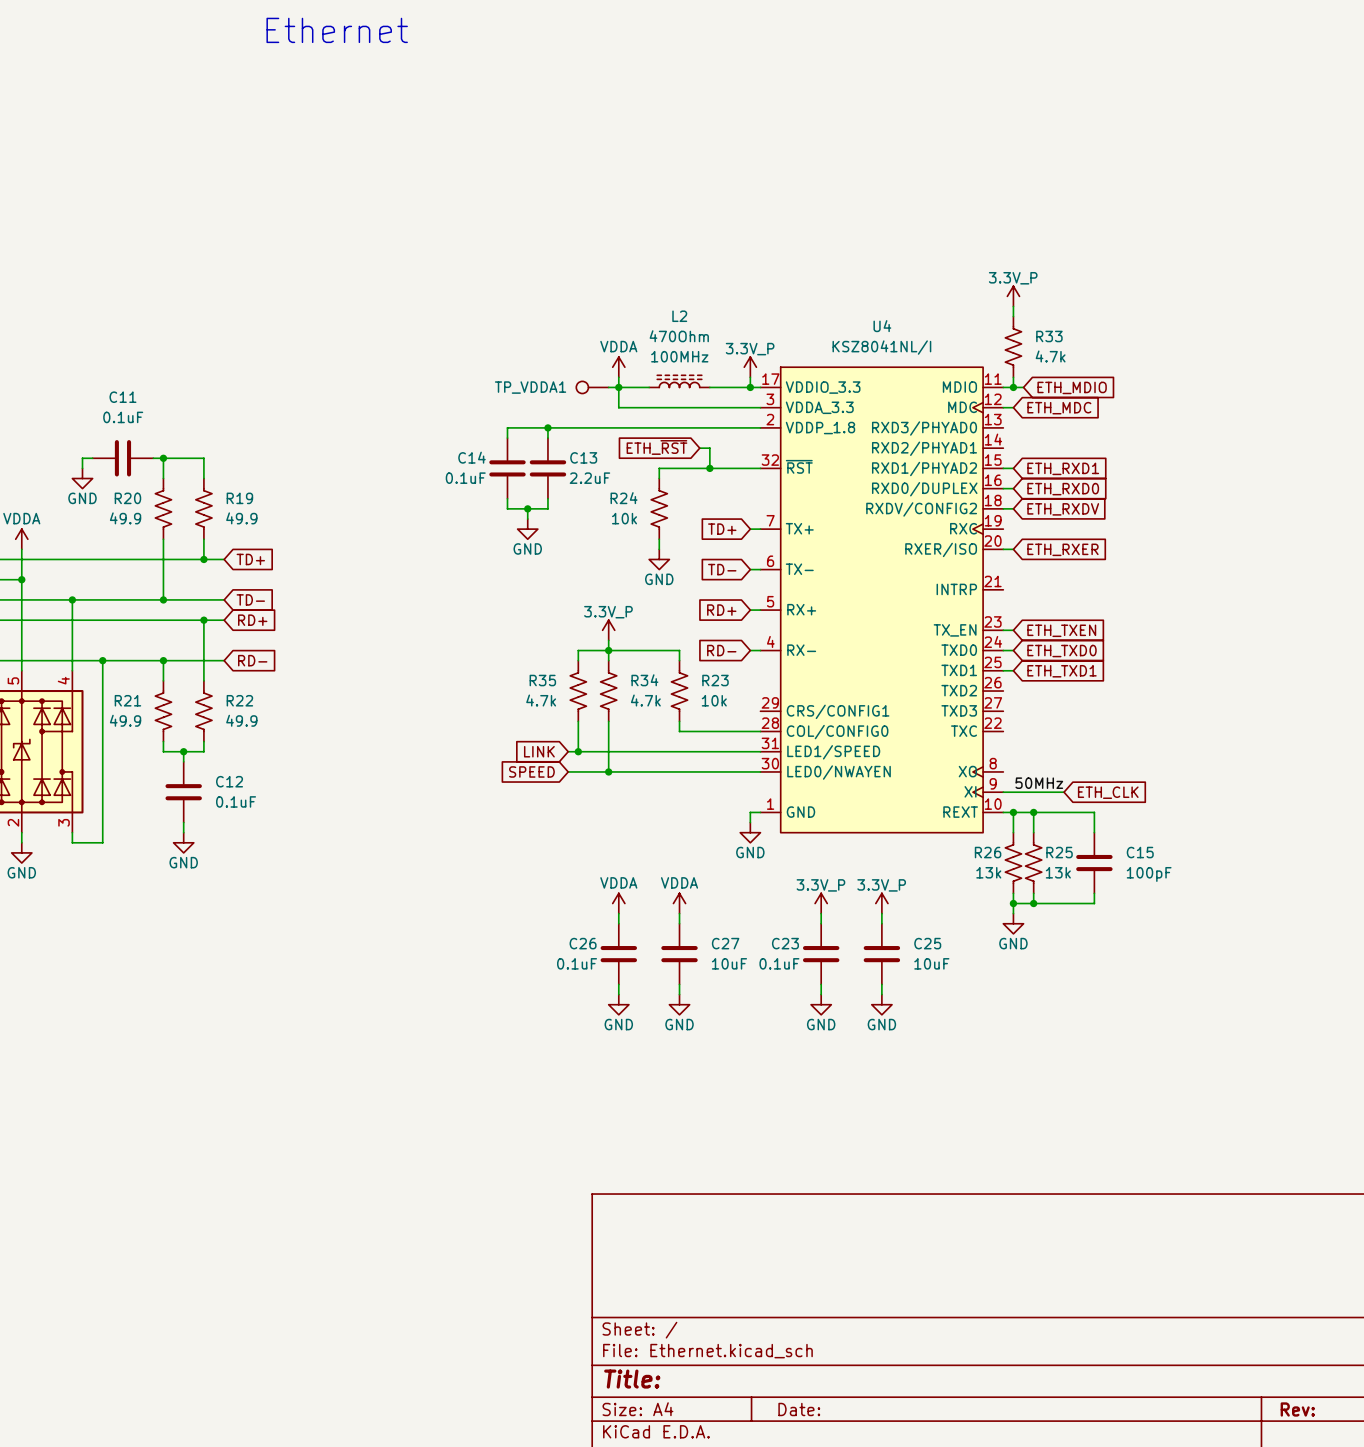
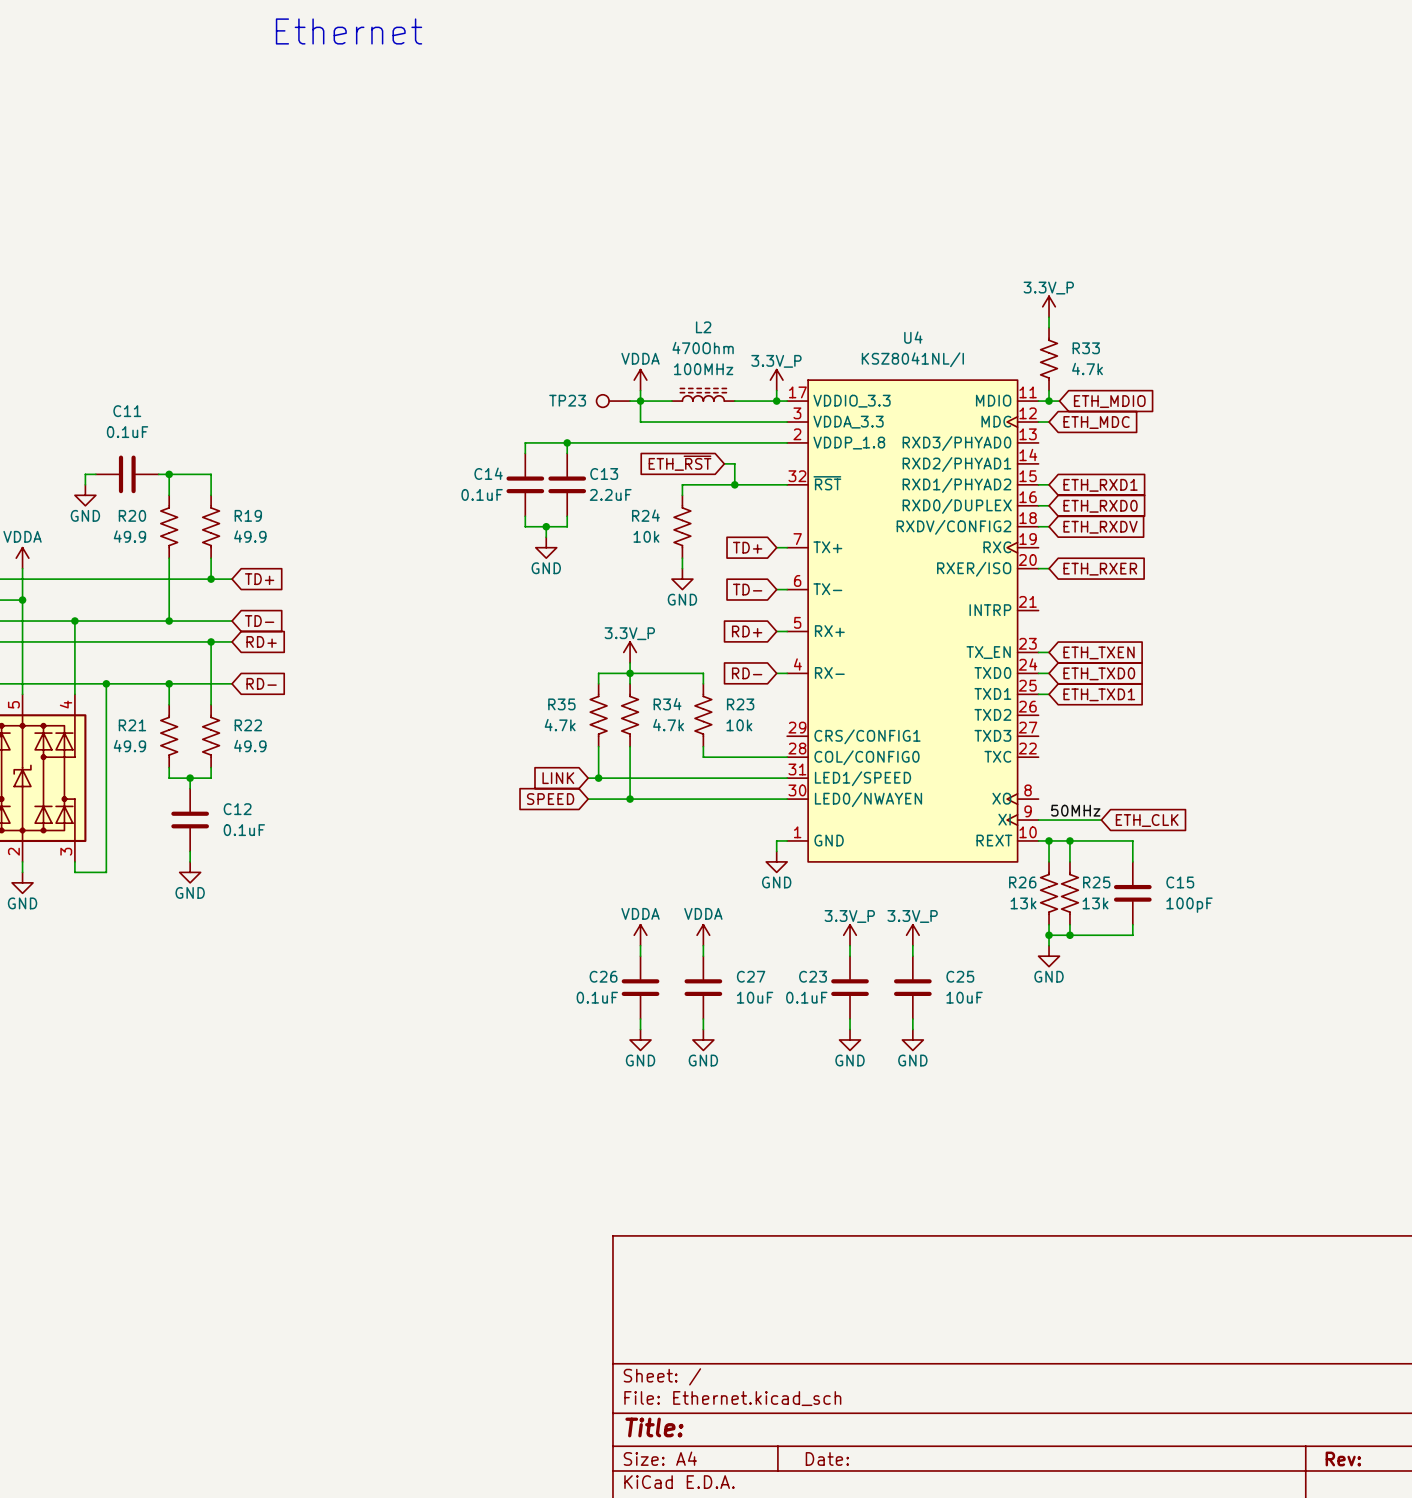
TP_VDDA1 name: TP_VDDA1 (530, 387) -> TP23 (567, 400)

